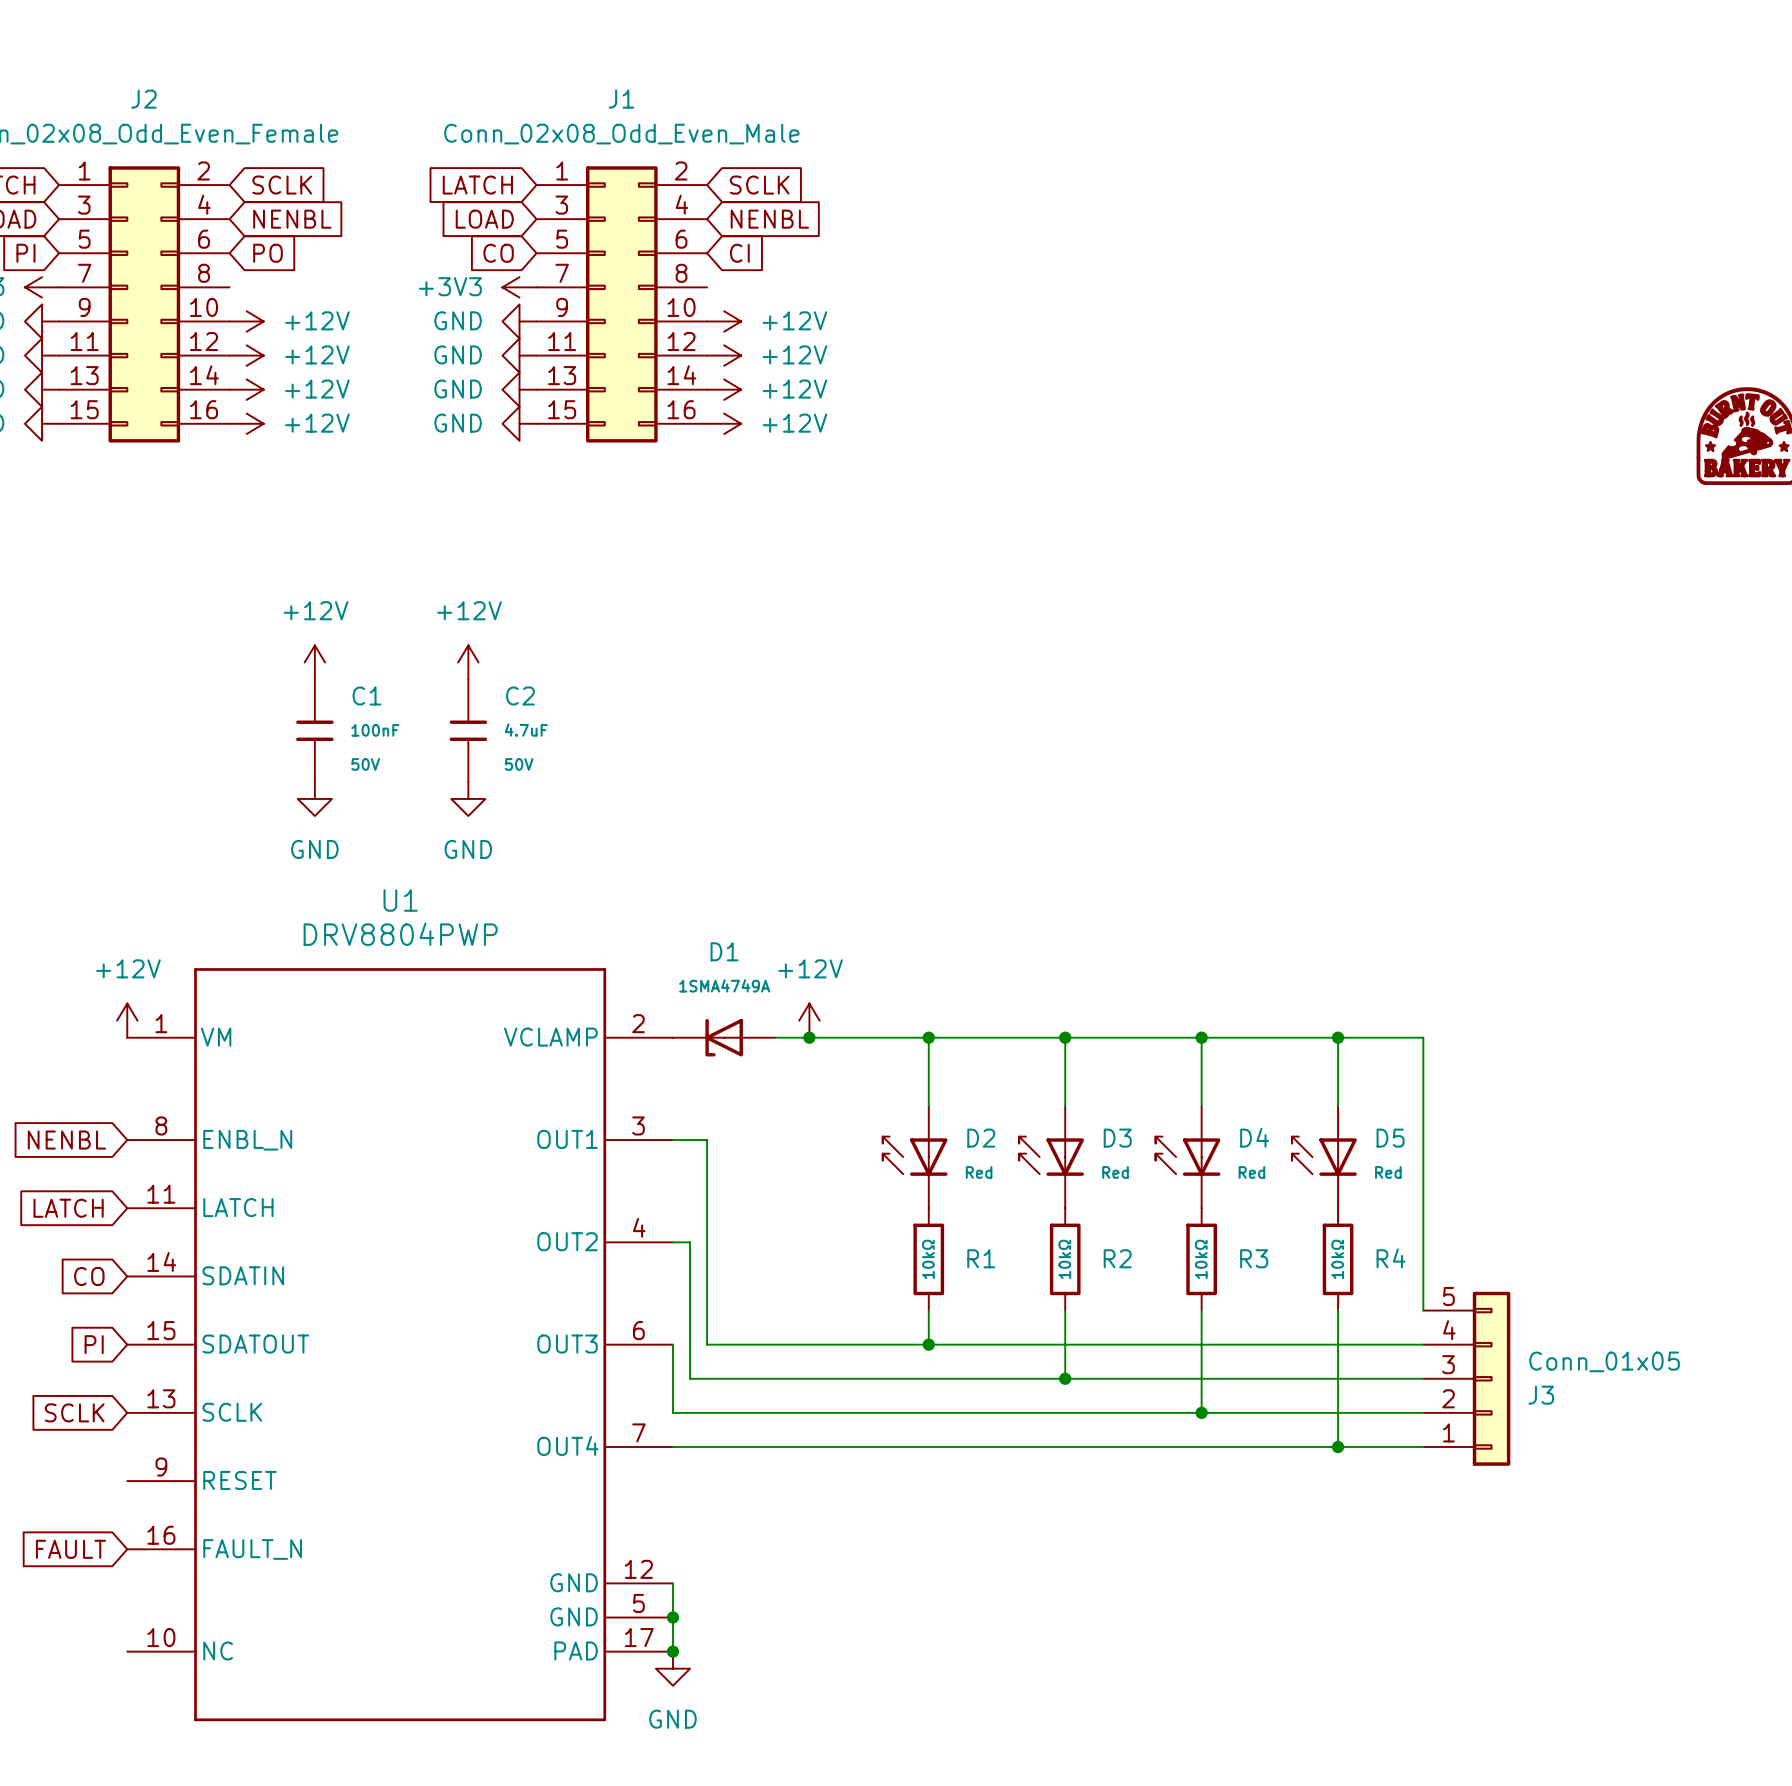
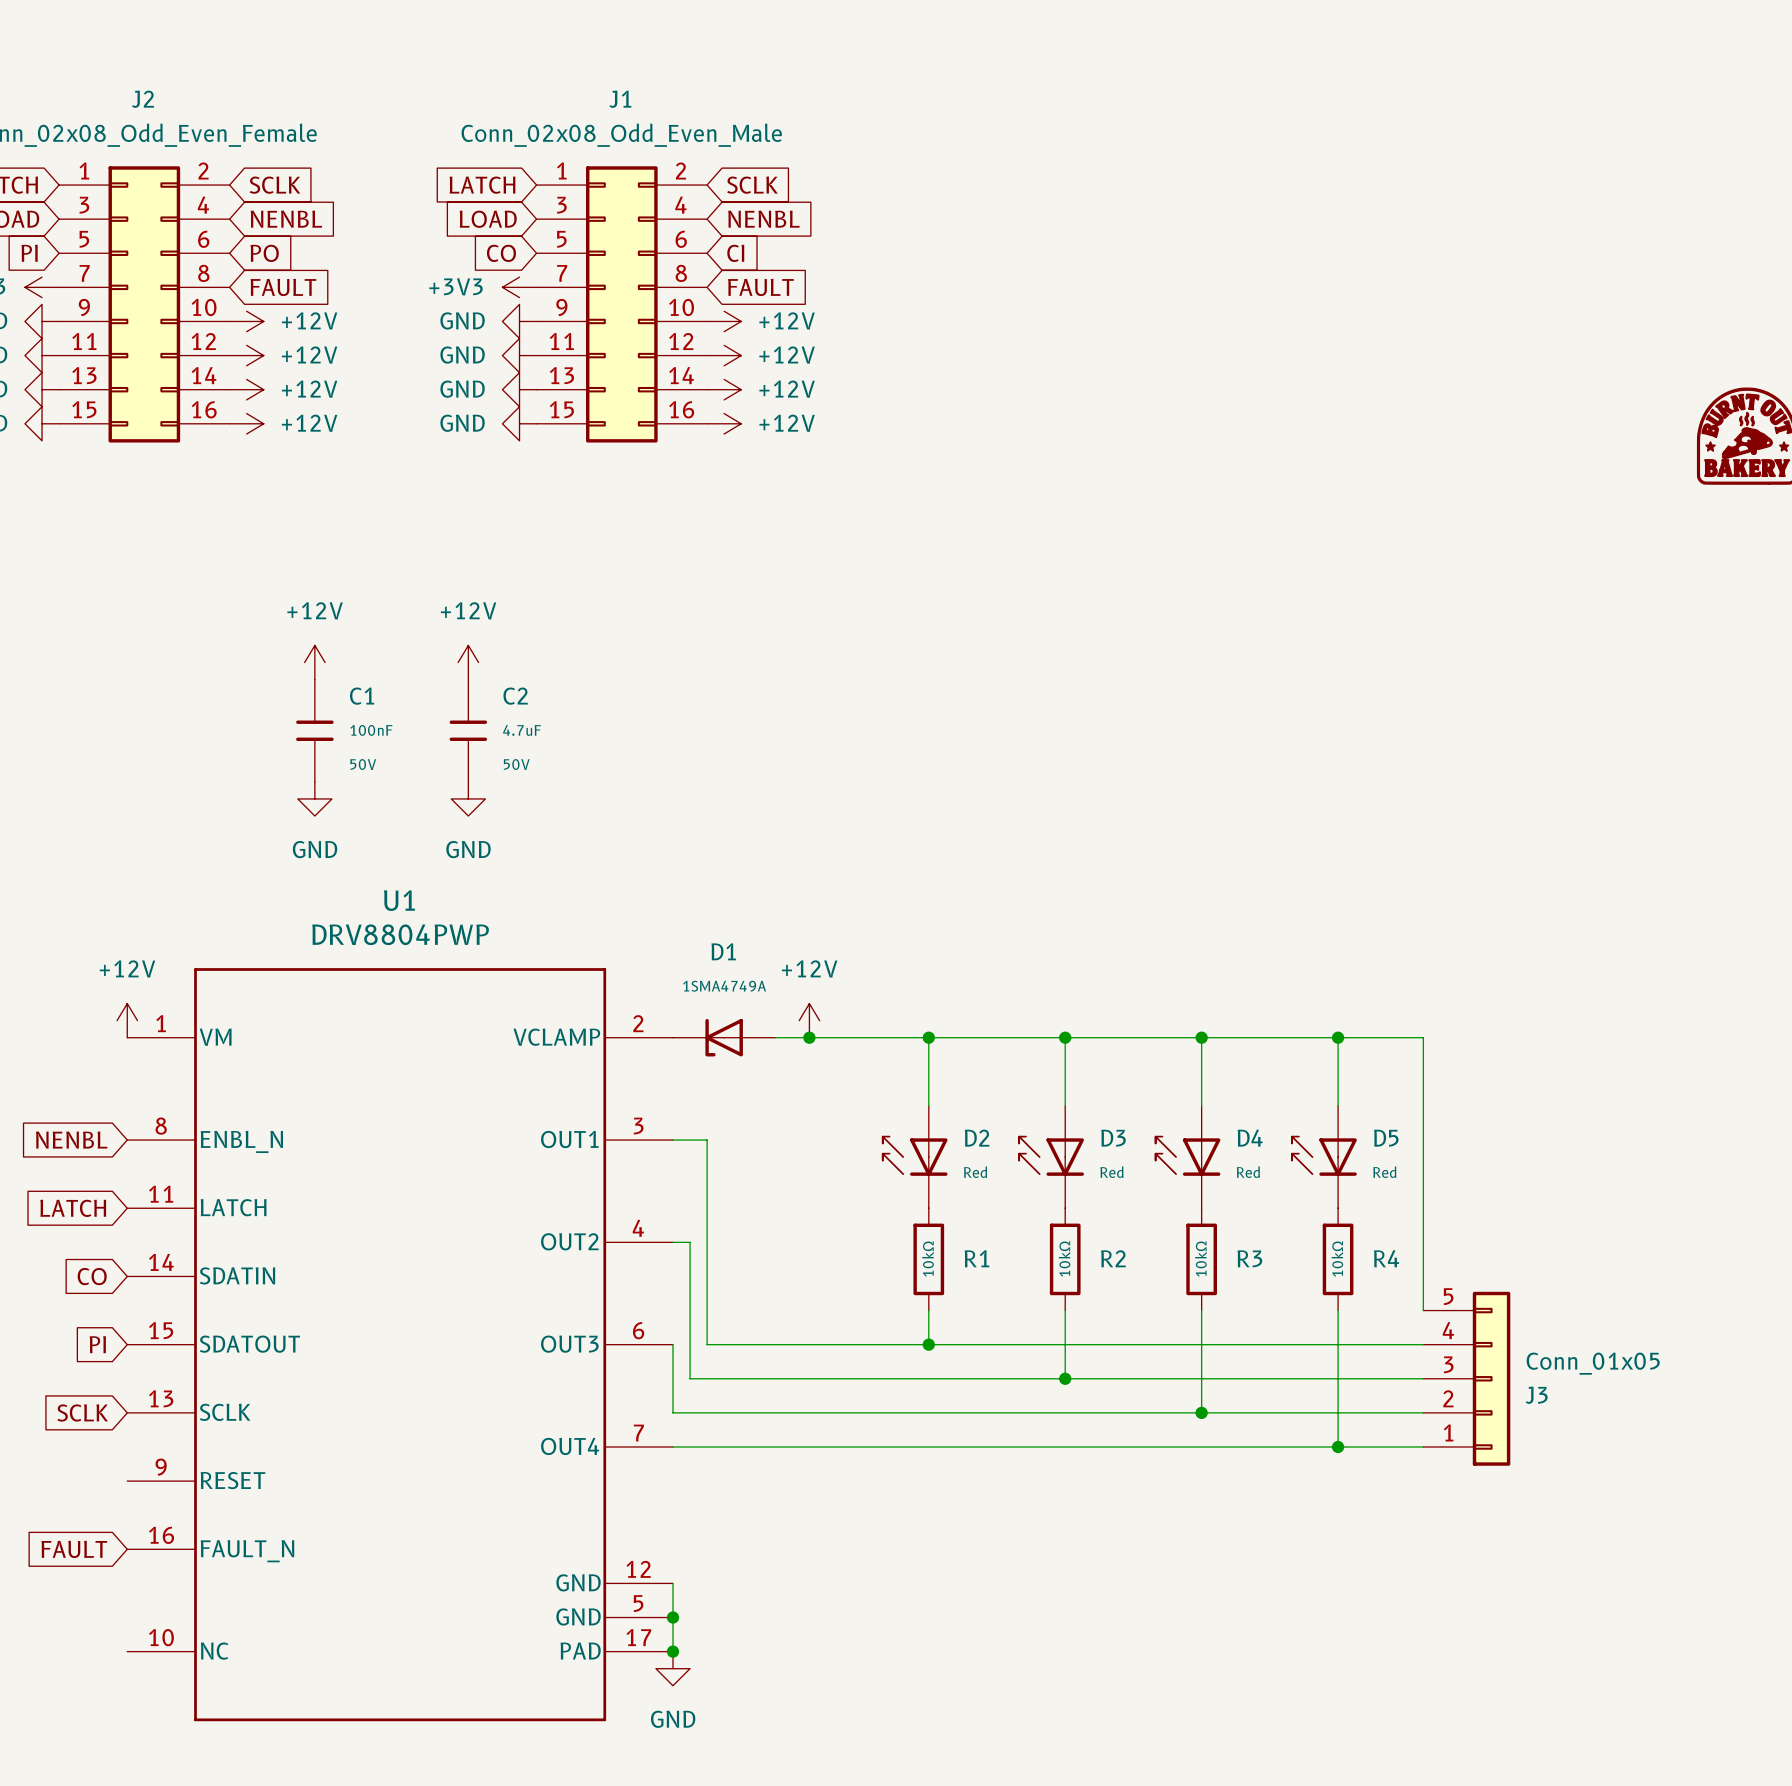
global label: none -> FAULT (283, 287)
global label: none -> FAULT (760, 287)

